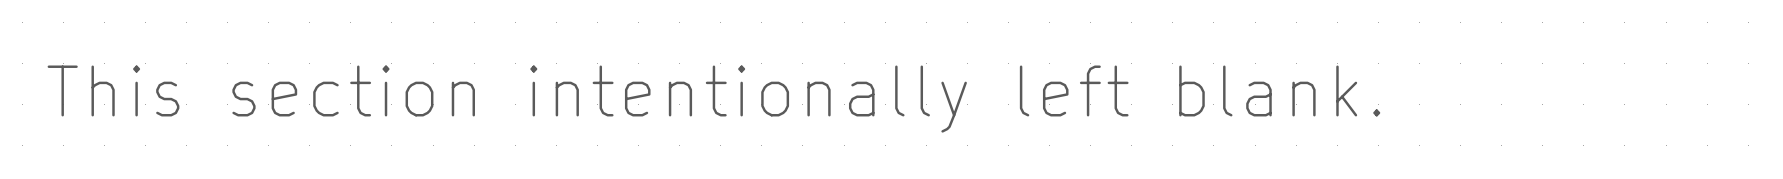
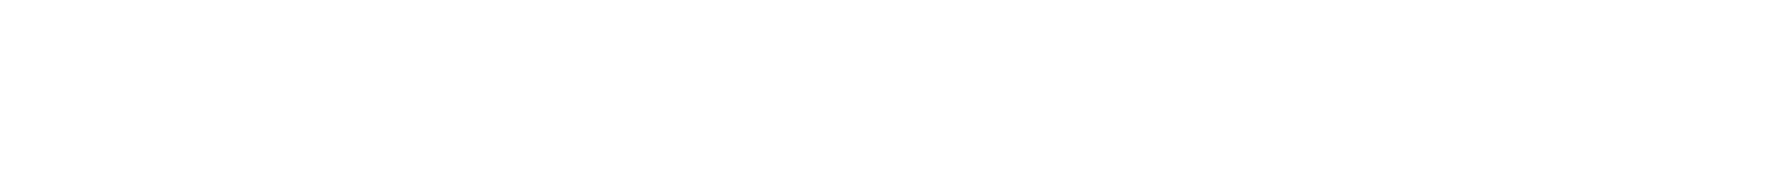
text: This section intentionally left blank. (713, 99) -> none

